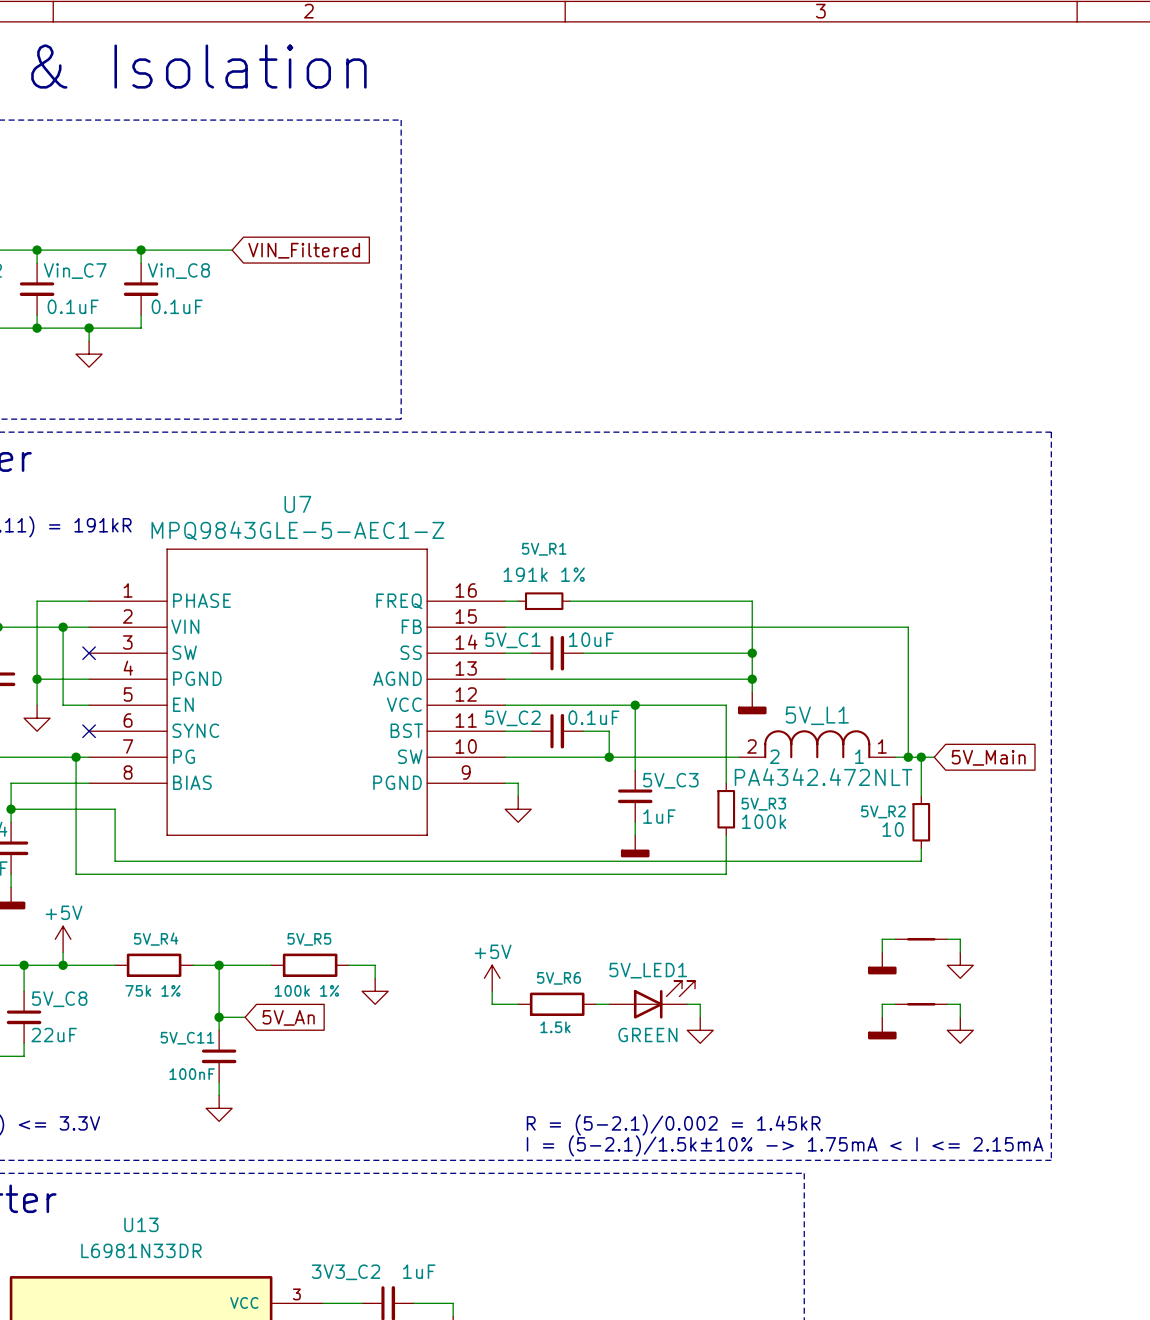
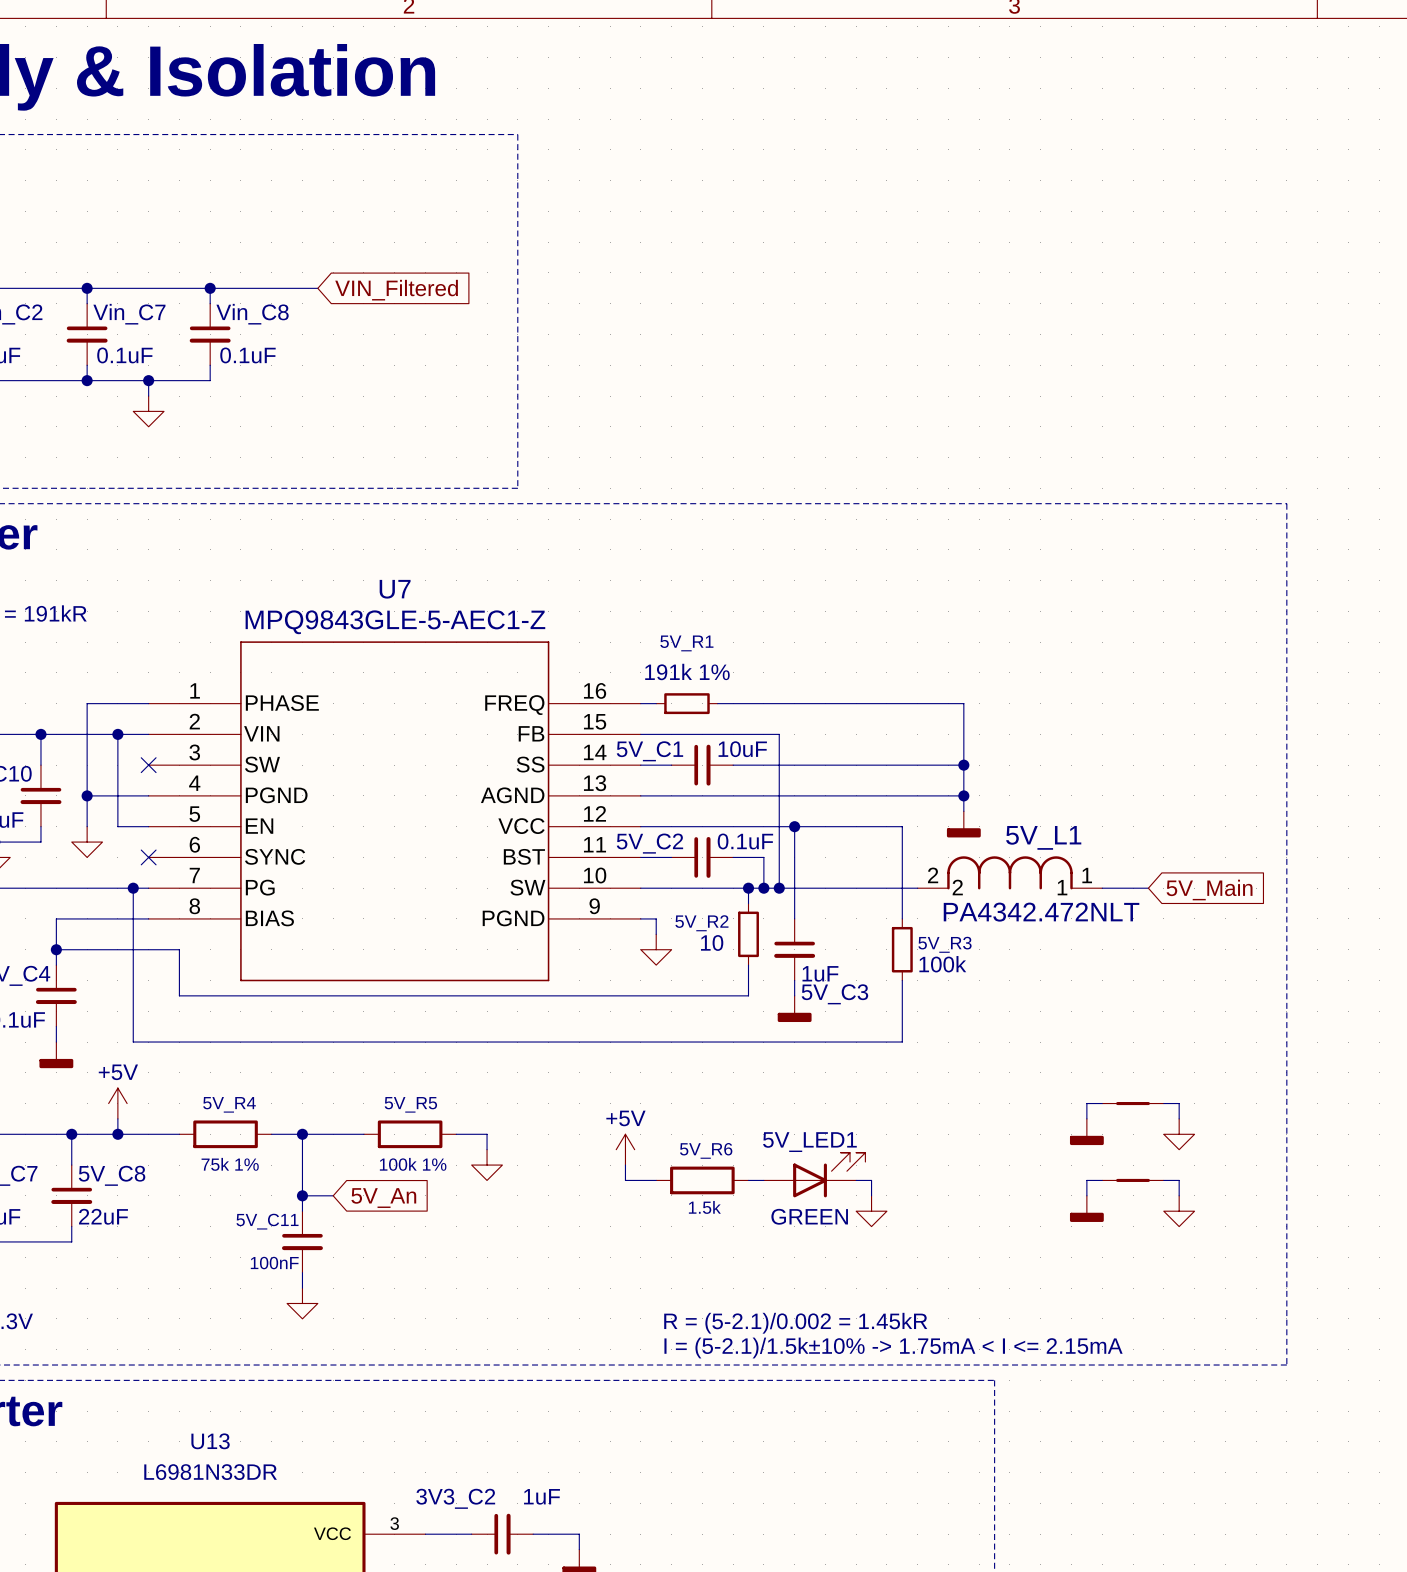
wire: (752, 601) (752, 692) -> (933, 703) (963, 703) (963, 811)
wire: (622, 627) (908, 627) (908, 757) -> (779, 734) (779, 888)
wire: none -> (933, 765) (963, 765)
junction: (752, 653) -> none
junction: none -> (963, 765)
wire: none -> (933, 795) (963, 795)
junction: (752, 679) -> none
junction: none -> (963, 795)
power symbol position: (752, 703) -> (963, 824)
5V_L1 name position: 5V_L1 (817, 715) -> 5V_L1 (1043, 837)
wire: none -> (748, 888) (748, 903)
junction: none -> (748, 888)
junction: none -> (779, 888)
junction: (908, 757) -> none
wire: (921, 757) (921, 796) -> none
junction: (921, 757) -> none
5V_L1 value position: PA4342.472NLT (823, 777) -> PA4342.472NLT (1041, 912)
5V_C3 name position: 5V_C3 (670, 780) -> 5V_C3 (834, 994)
5V_C3 position: (635, 796) -> (794, 949)
5V_R2 position: (921, 822) -> (748, 934)
power symbol position: (635, 846) -> (794, 1008)
wire: (115, 848) (115, 861) (921, 861) (921, 848) -> (179, 995) (748, 995) (748, 965)
wire: (76, 874) (726, 874) -> (133, 1026) (133, 1042) (902, 1042) (902, 1026)

